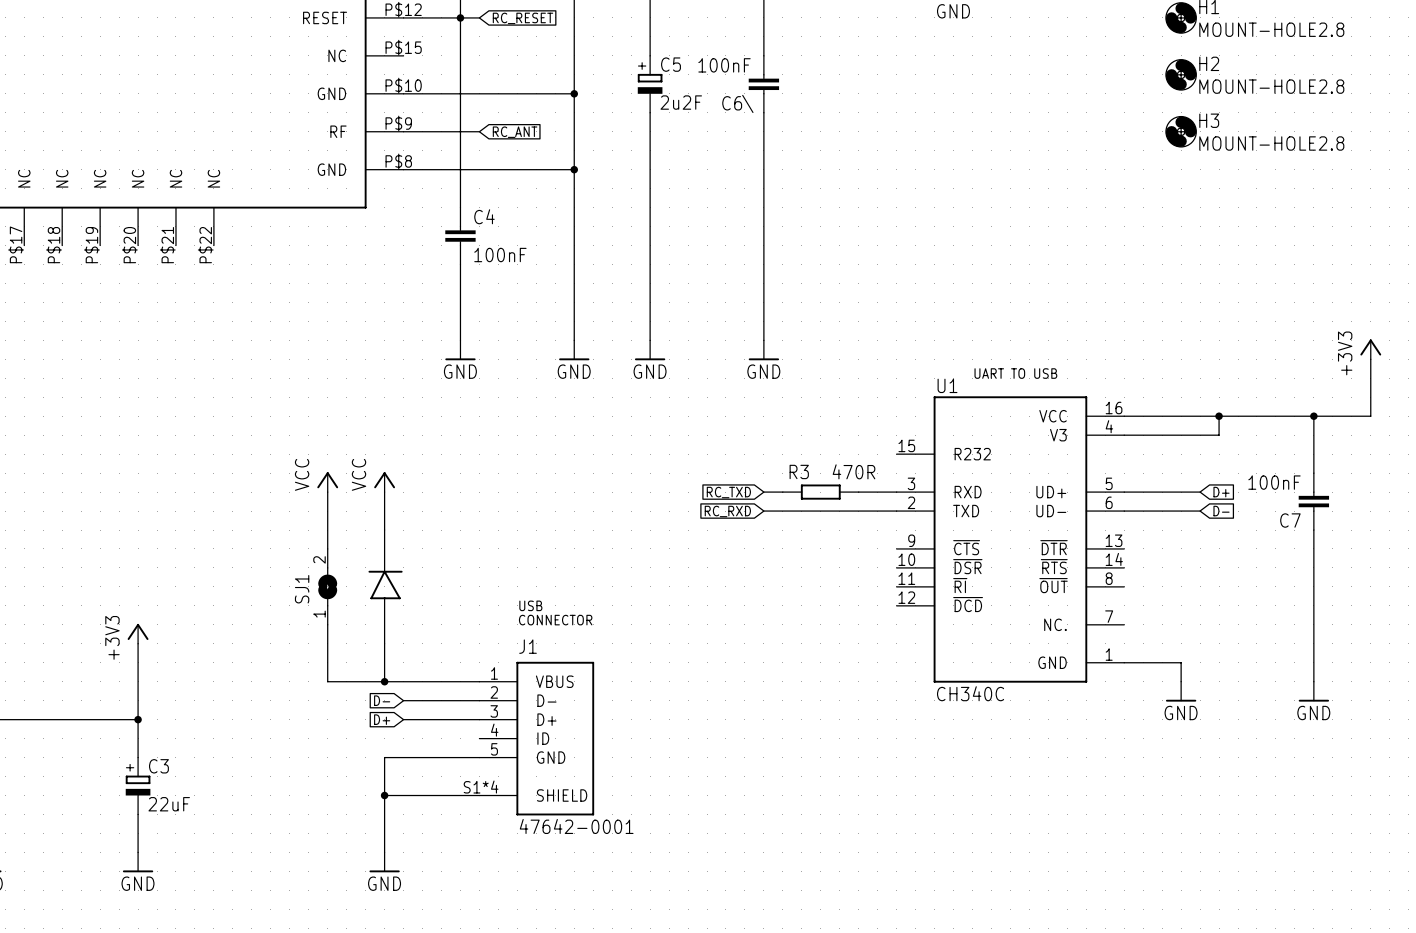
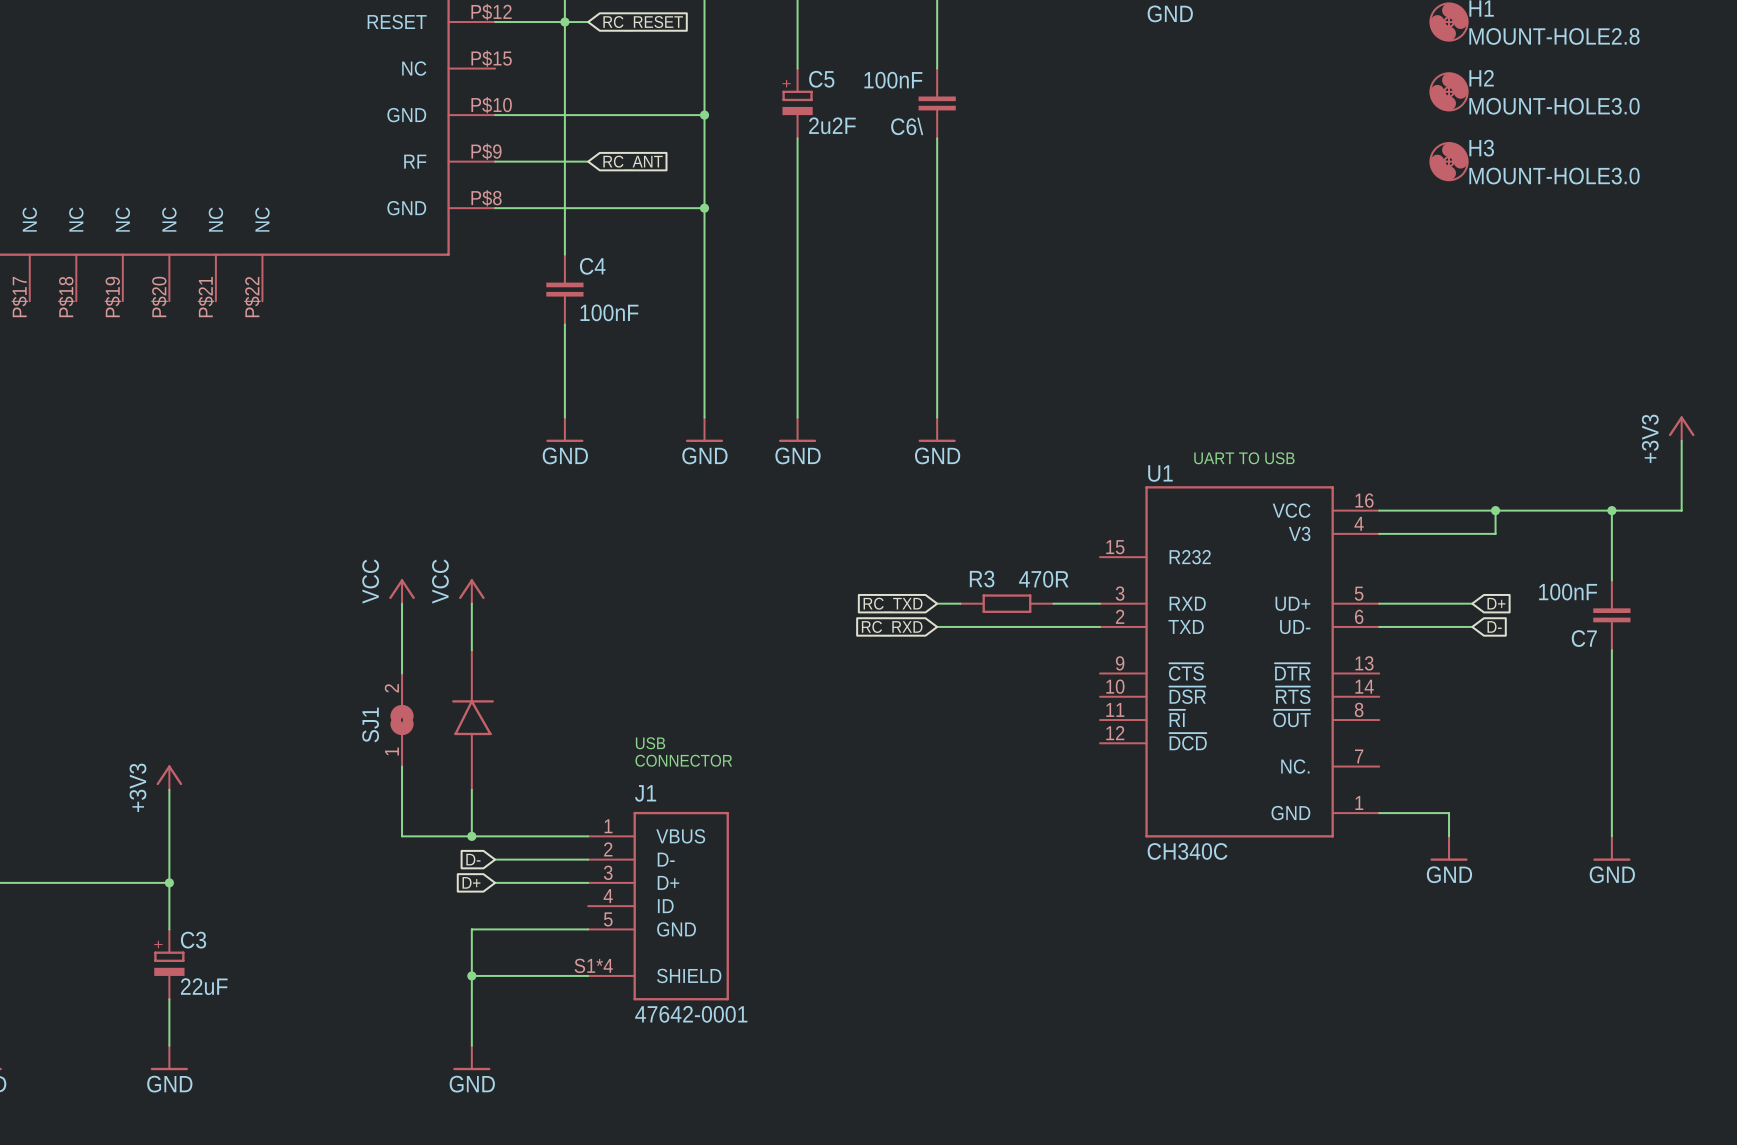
H2 value: MOUNT-HOLE2.8 (1271, 86) -> MOUNT-HOLE3.0 (1554, 106)
H3 value: MOUNT-HOLE2.8 (1271, 143) -> MOUNT-HOLE3.0 (1554, 176)

